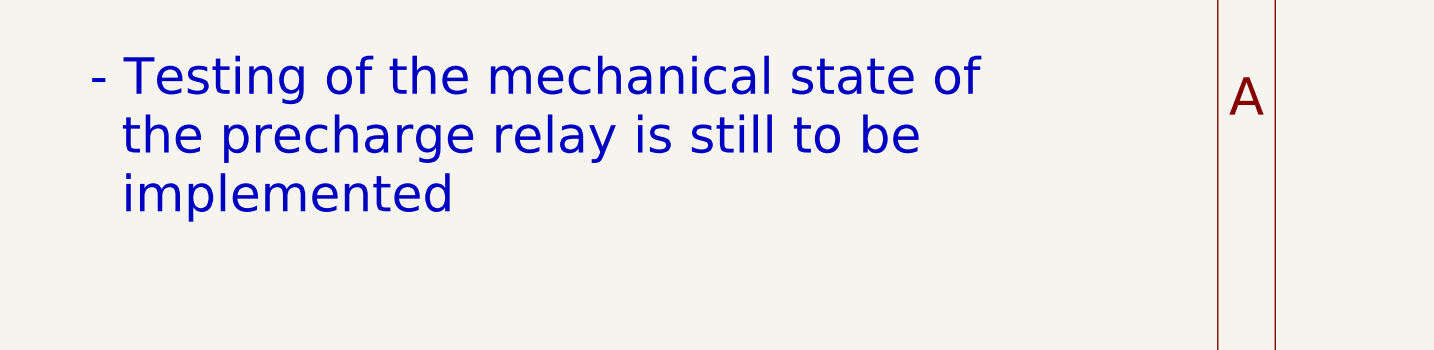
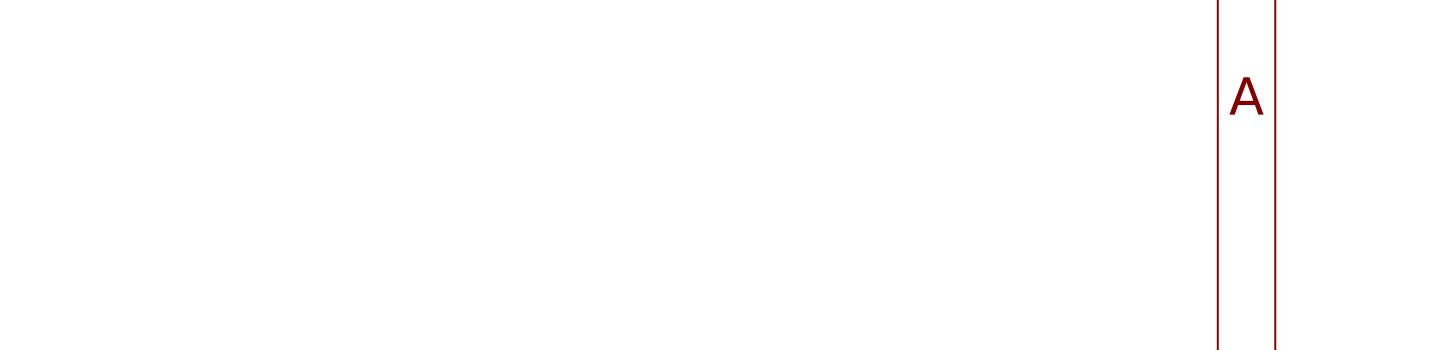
text: - Testing of the mechanical state of (536, 79) -> none
text: the precharge relay is still to be (520, 138) -> none
text: implemented (287, 197) -> none

